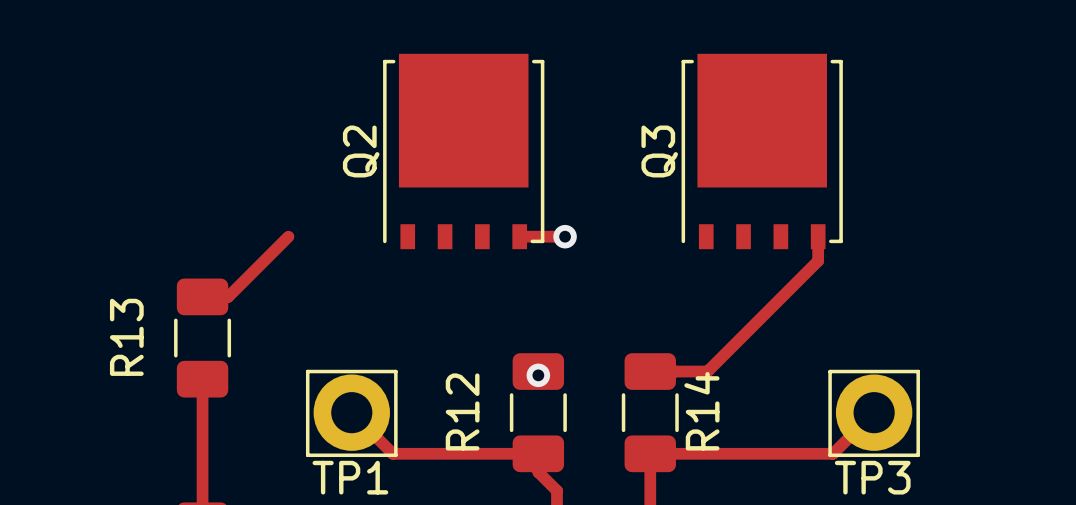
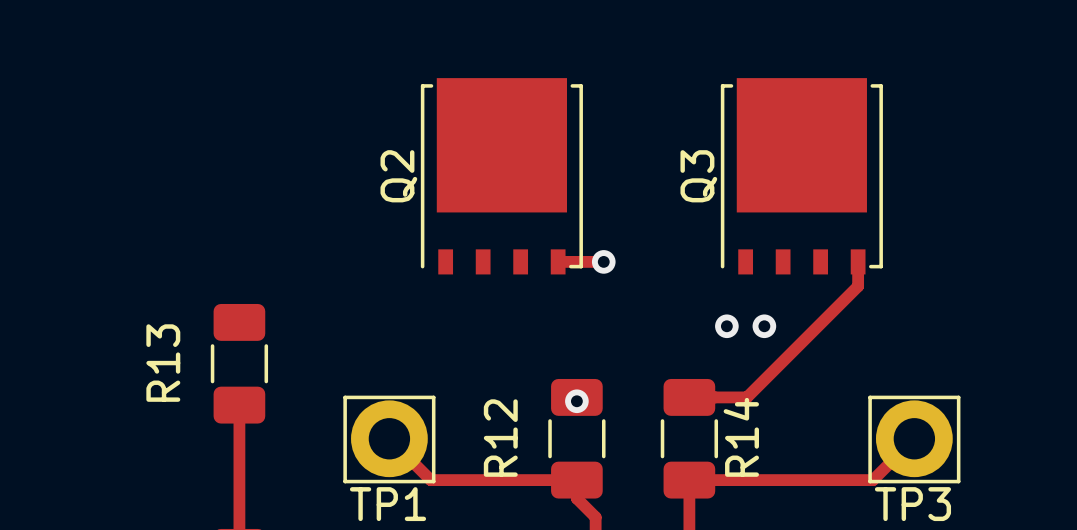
track: (288, 236) (228, 296) (202, 296) -> none
via: none -> (726, 326)
via: none -> (764, 326)

